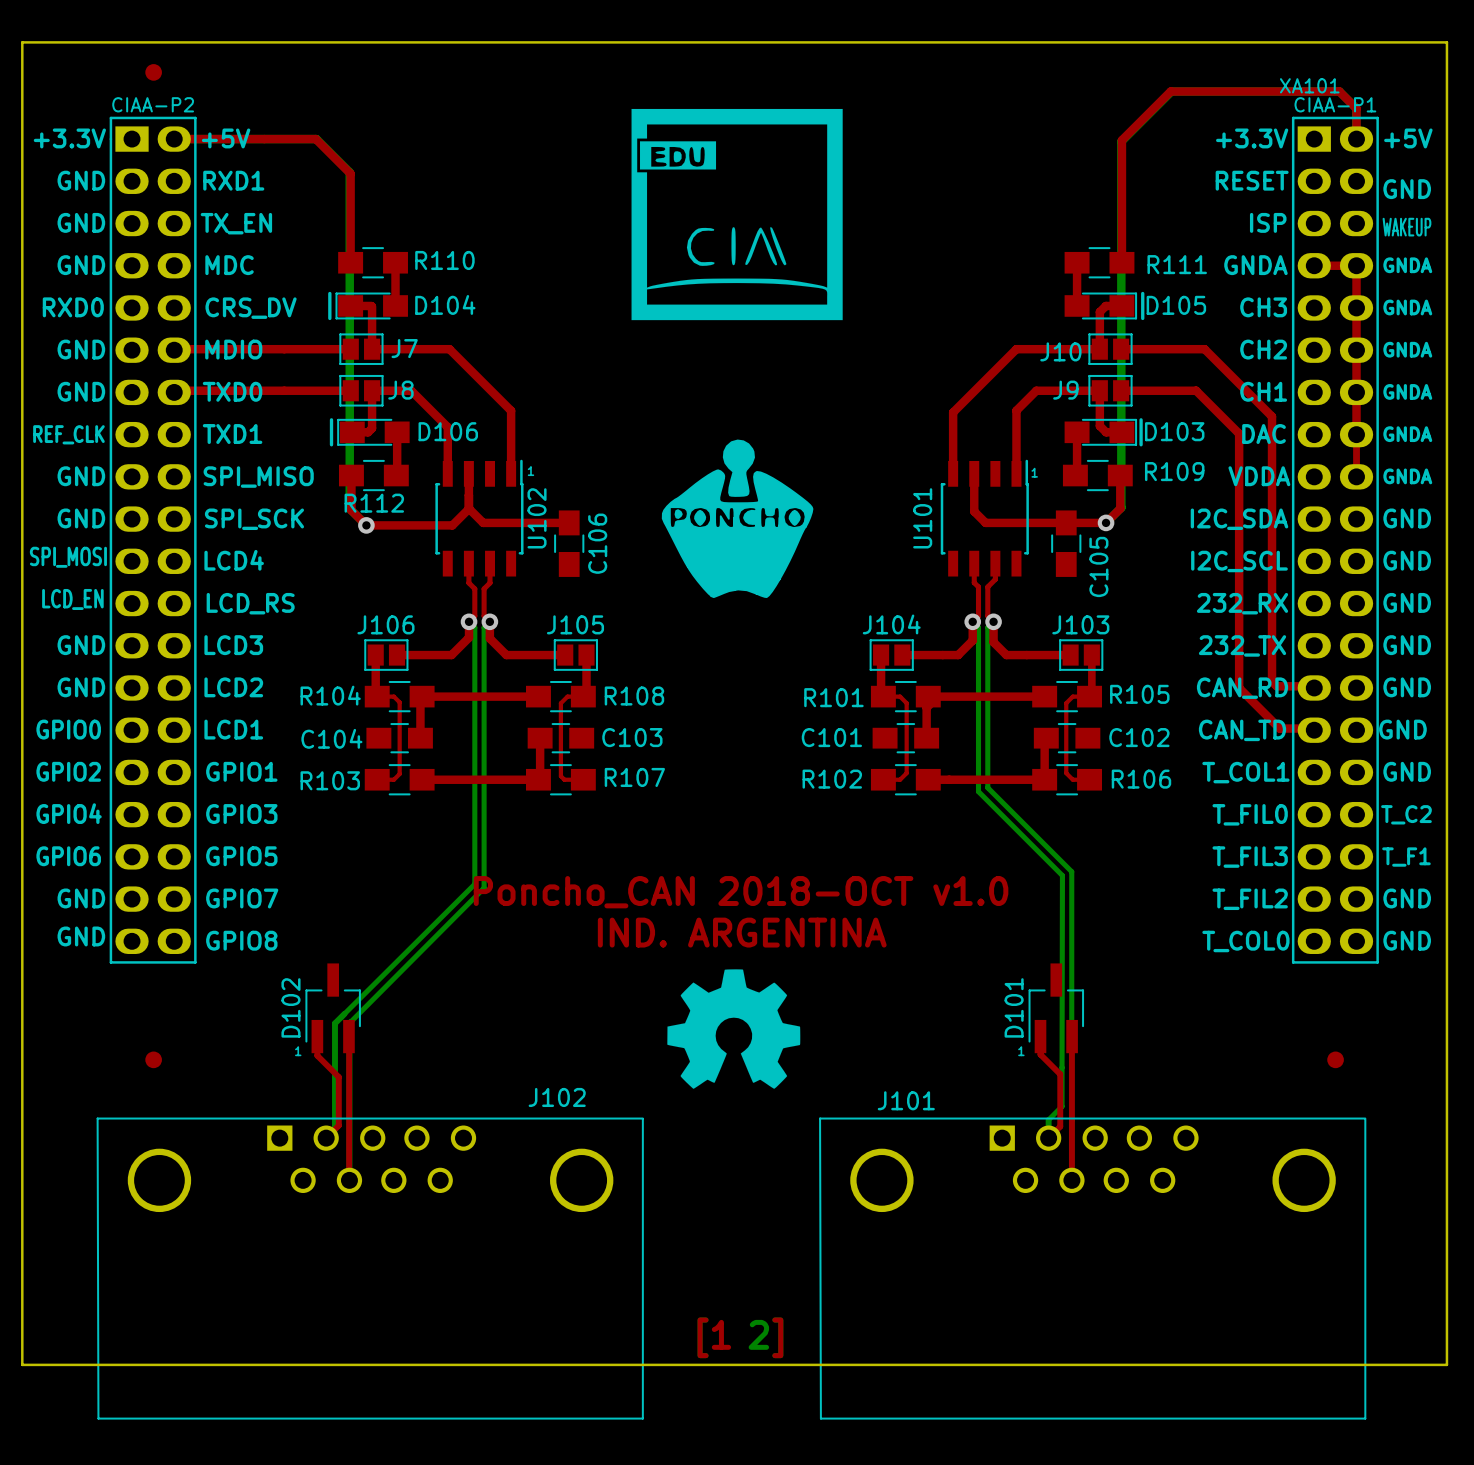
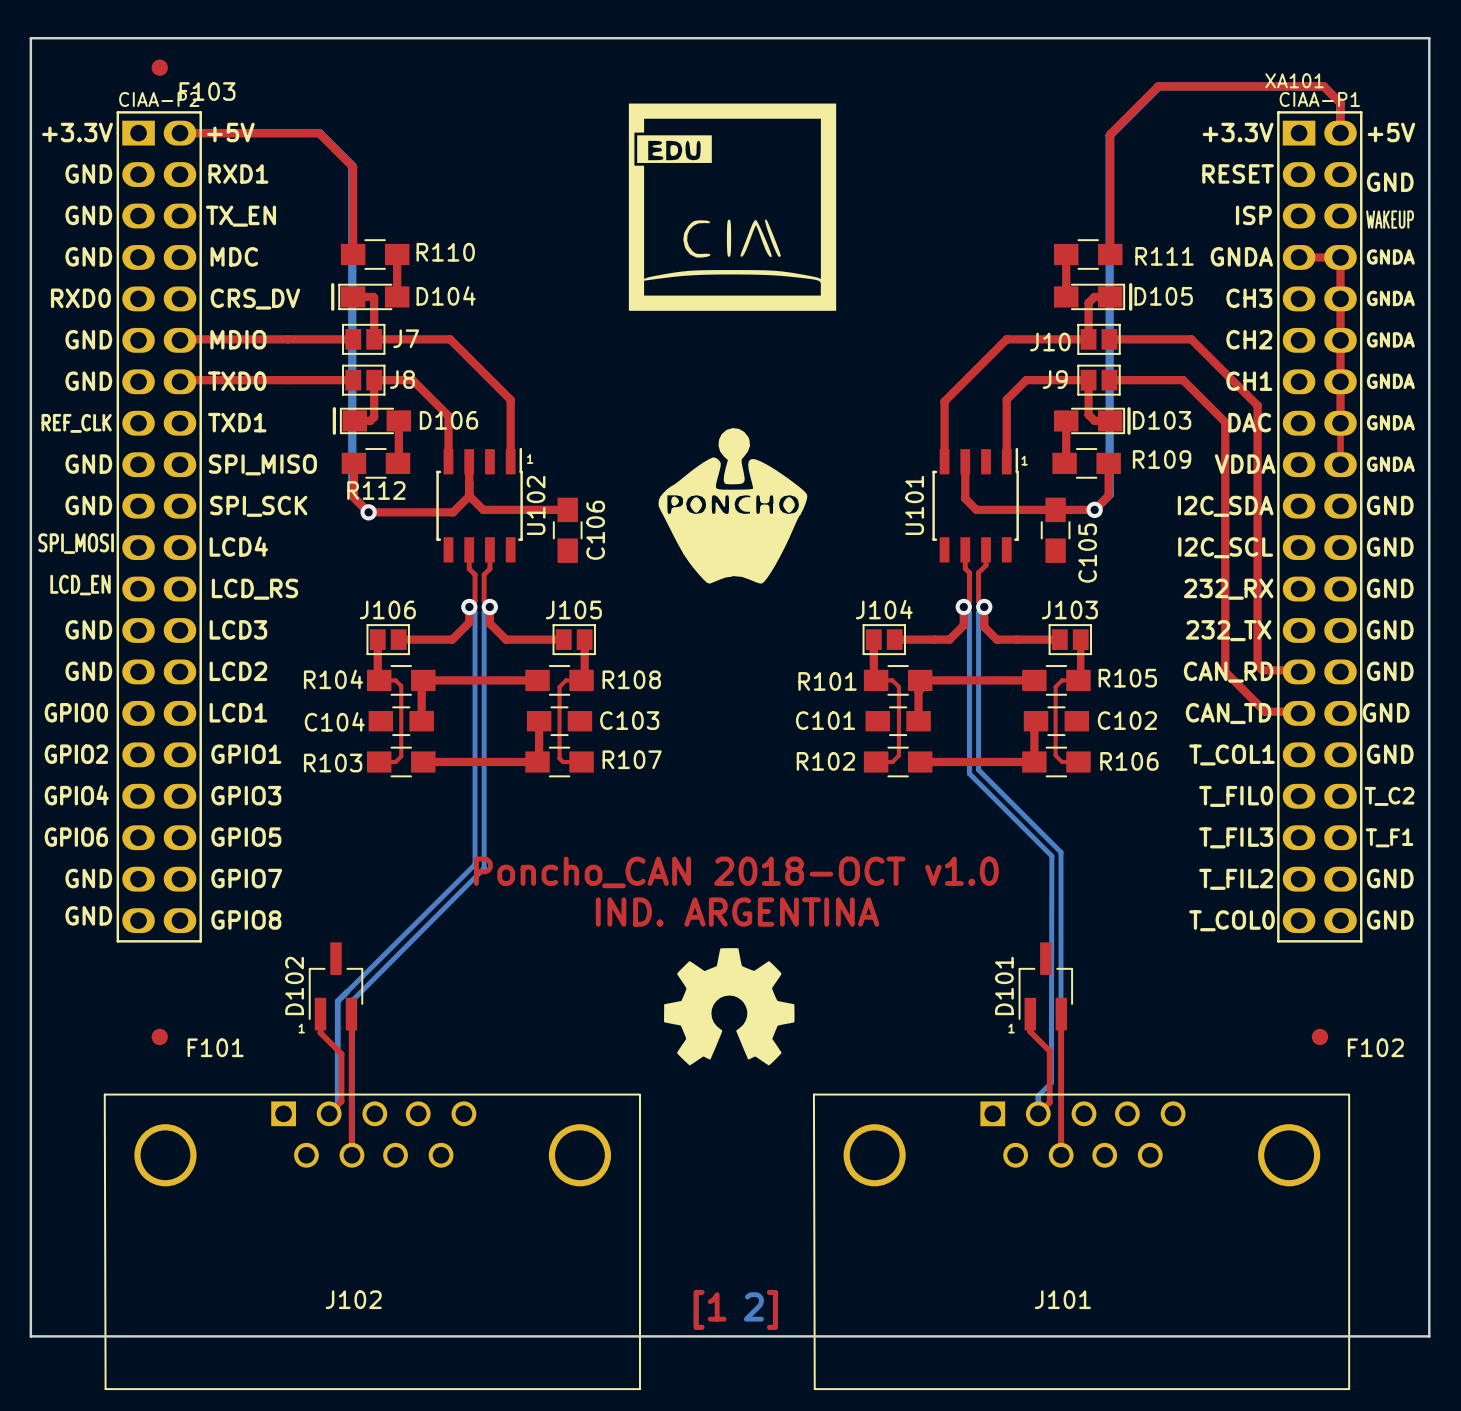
F103 name: none -> F103 (207, 91)
F101 name: none -> F101 (215, 1047)
F102 name: none -> F102 (1375, 1047)
J102 name position: J102 (557, 1097) -> J102 (353, 1299)
J101 name position: J101 (906, 1100) -> J101 (1062, 1299)

